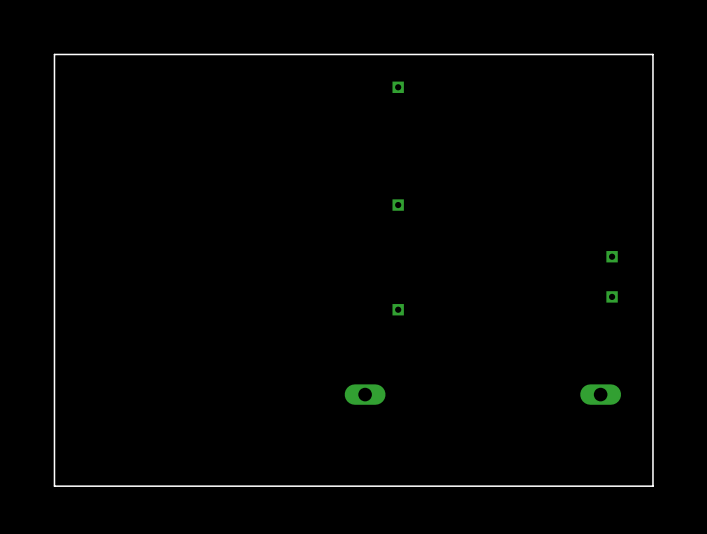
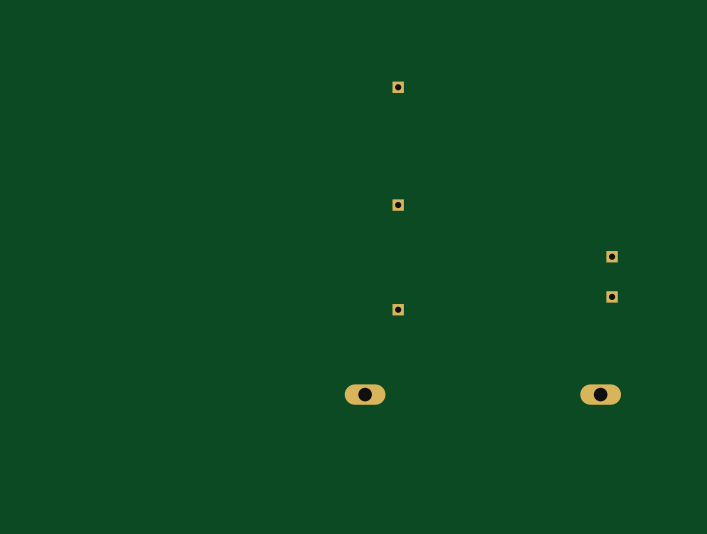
board edge: (652, 54) (54, 54) (54, 486) (652, 486) (652, 54) -> none

